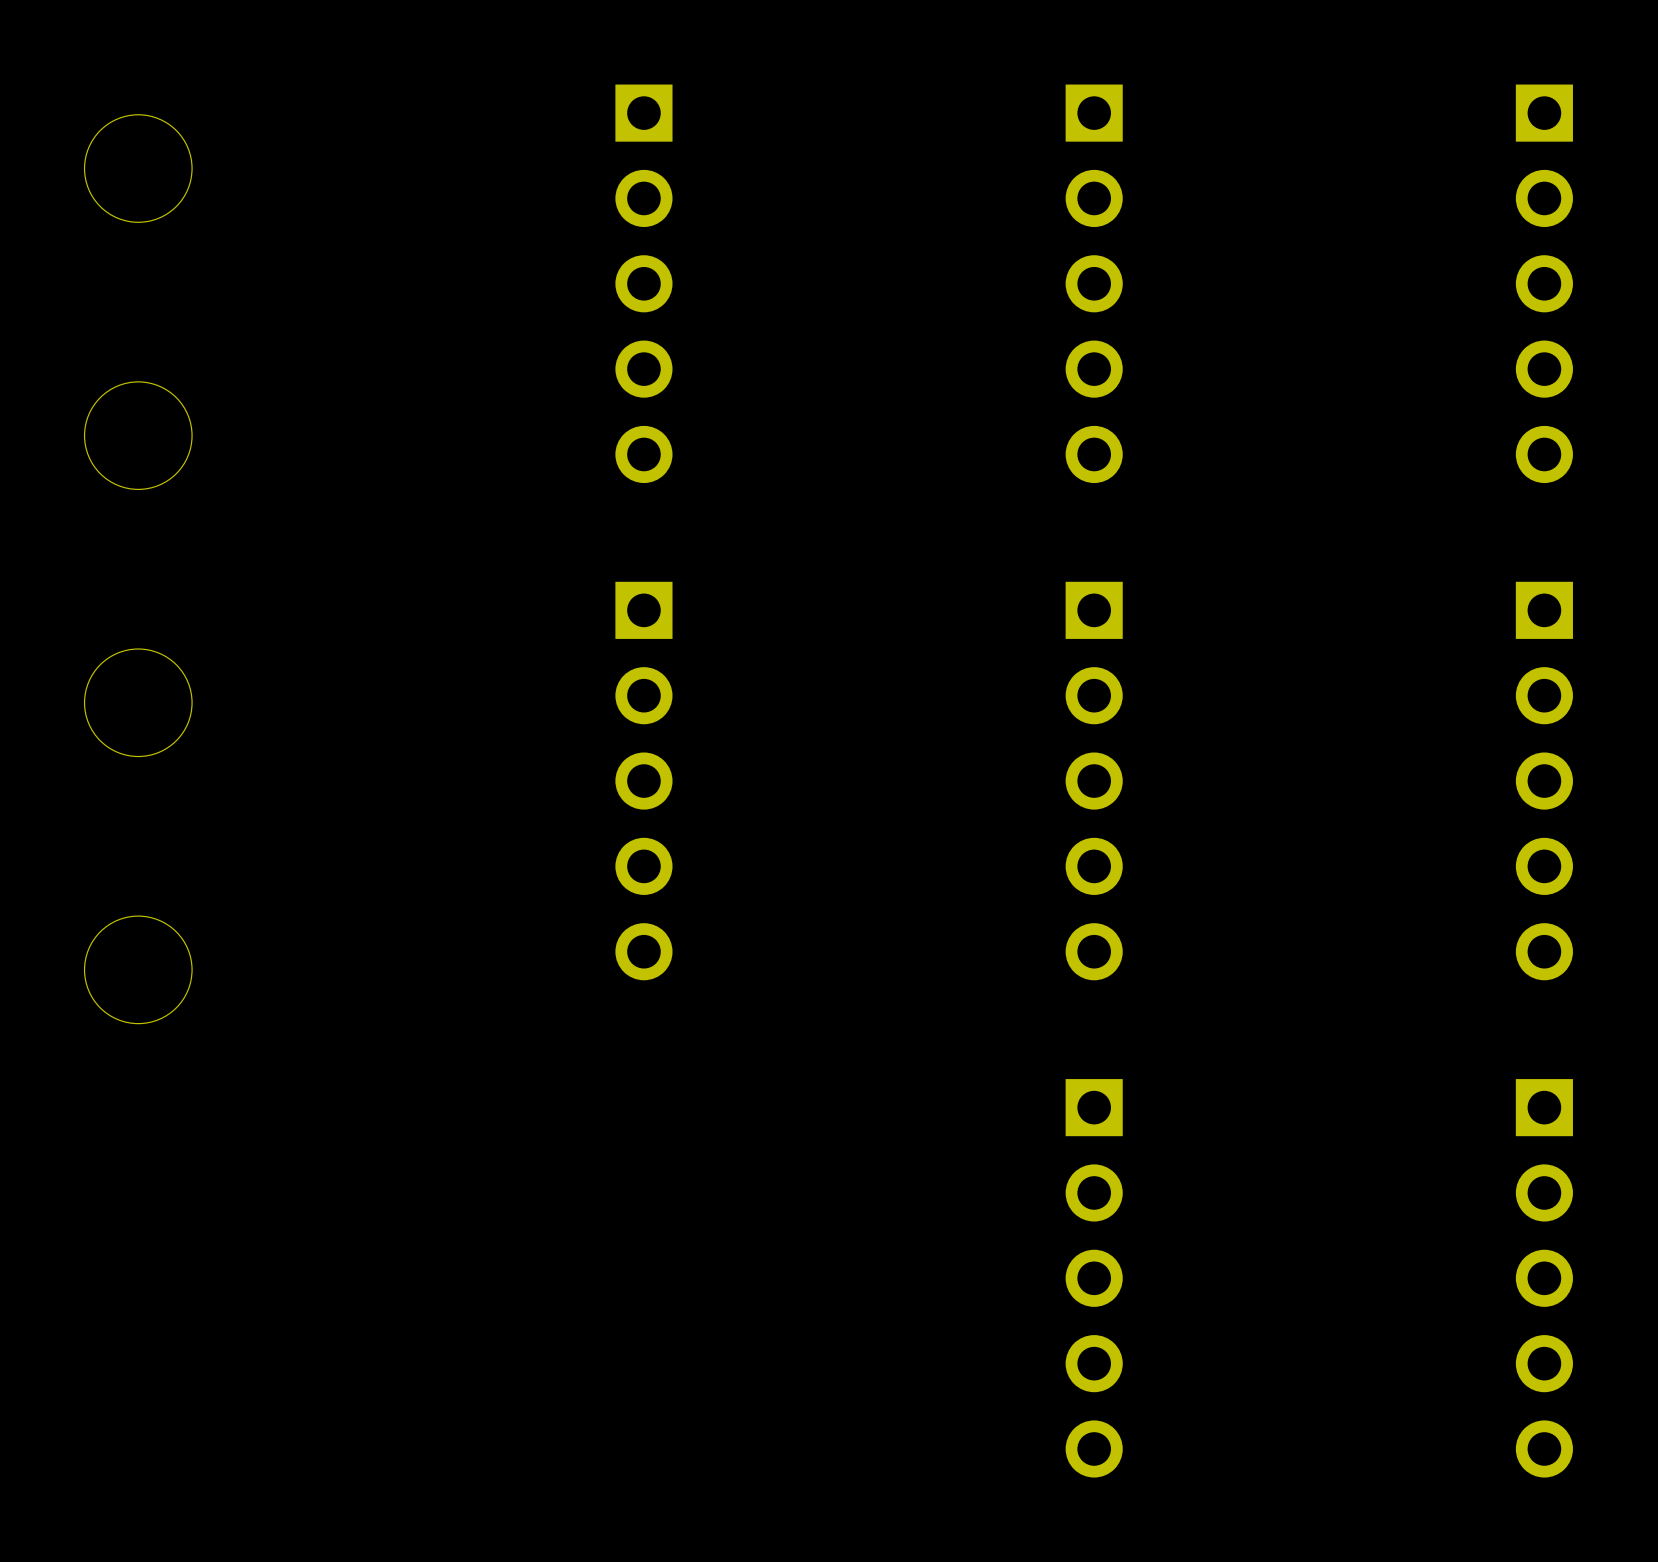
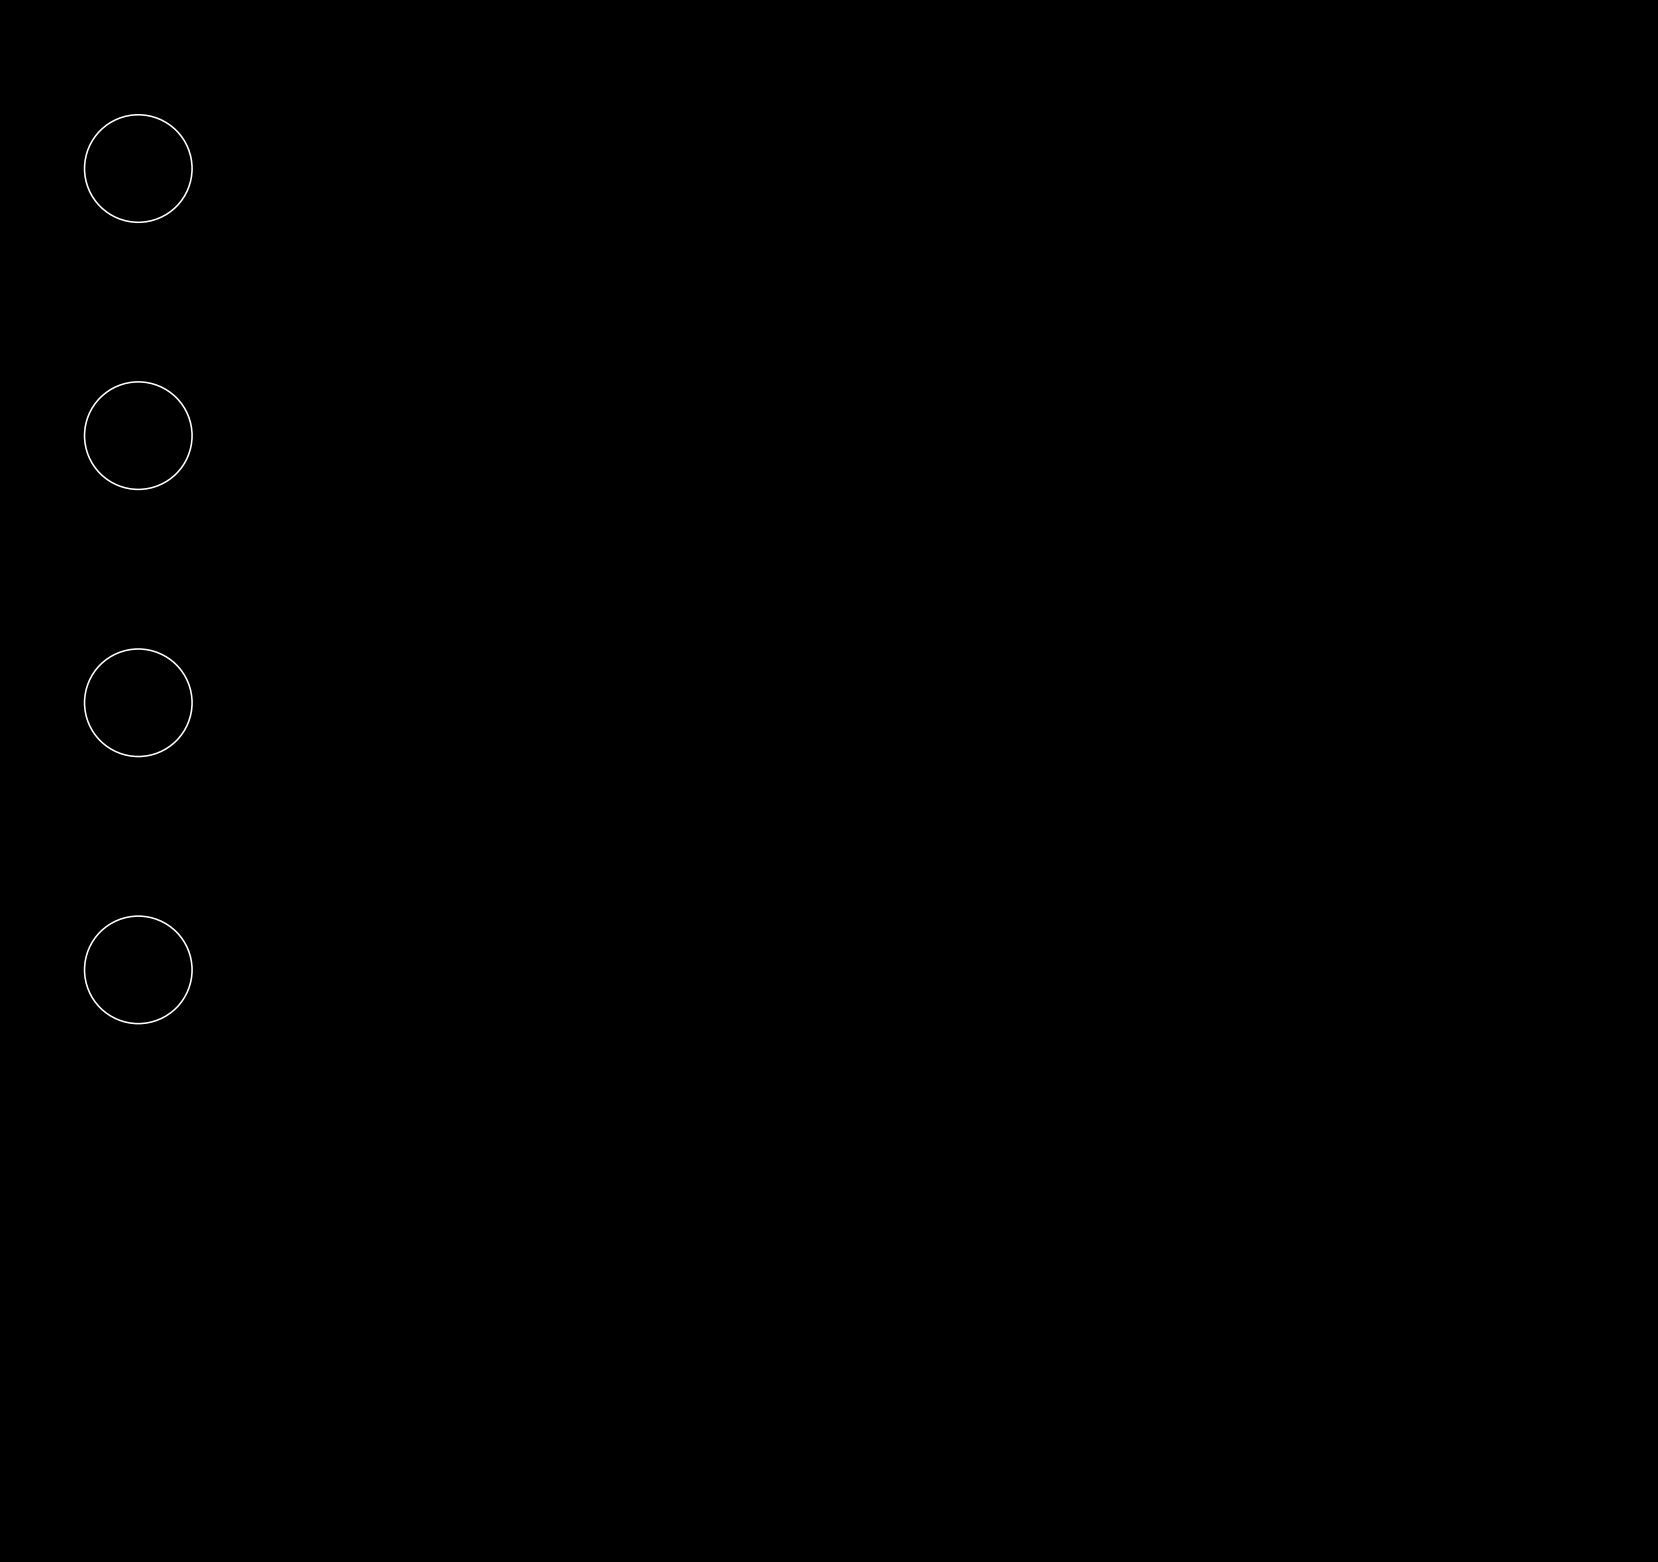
part: (643, 283) -> none
part: (1094, 283) -> none
part: (1544, 283) -> none
part: (643, 781) -> none
part: (1094, 781) -> none
part: (1544, 781) -> none
part: (1094, 1278) -> none
part: (1544, 1278) -> none

